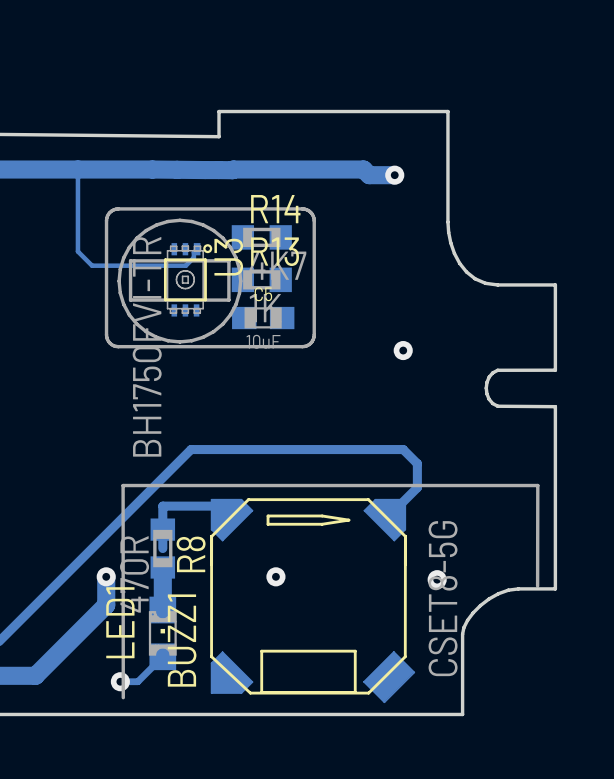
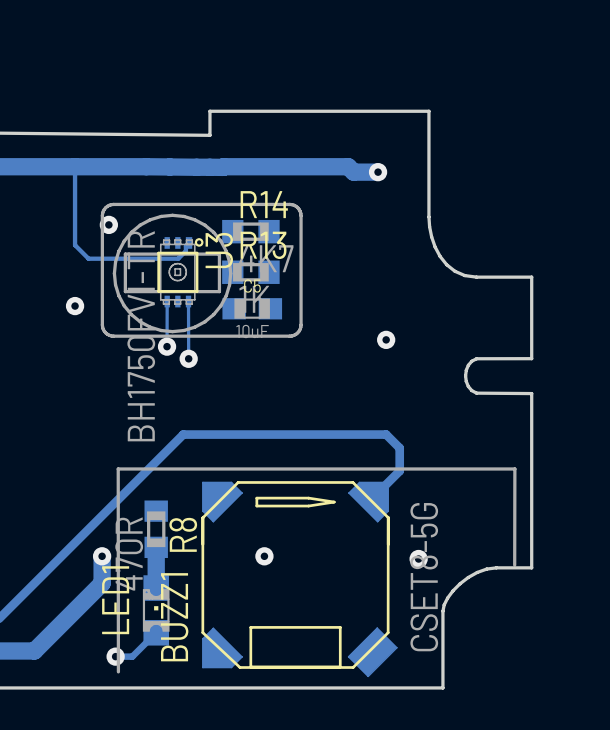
via: none -> (108, 224)
track: none -> (167, 301) (167, 346)
track: none -> (188, 301) (188, 358)
via: none -> (75, 306)
via: none -> (167, 346)
via: none -> (188, 358)
track: (233, 520) (219, 506) (162, 506) (162, 548) -> none

